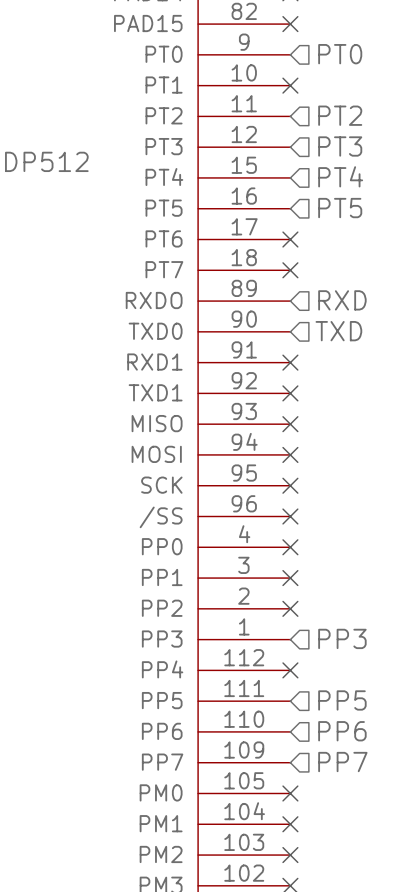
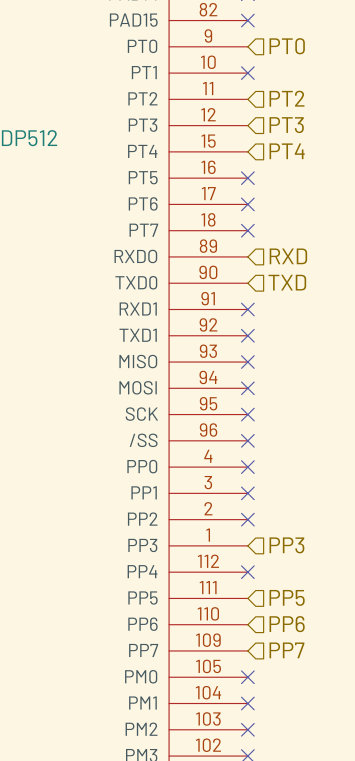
no-connect mark: none -> (247, 178)
hierarchical label: PT5 (340, 208) -> none

